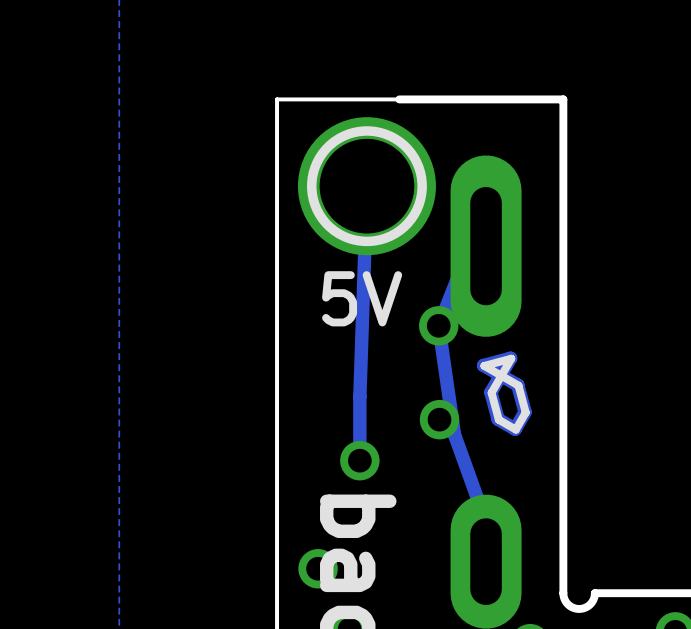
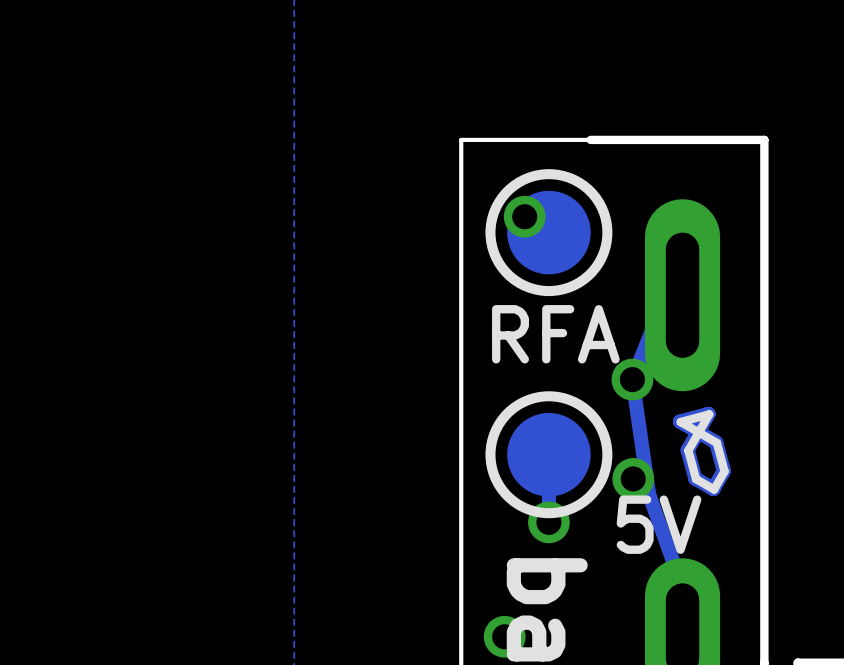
part footprint: [297, 117, 436, 256] -> [485, 169, 613, 297]
via: none -> (524, 216)
track: (366, 186) (359, 396) -> none
part value: 5V (362, 298) -> RFA (555, 334)
part: none -> 5V (548, 454)

